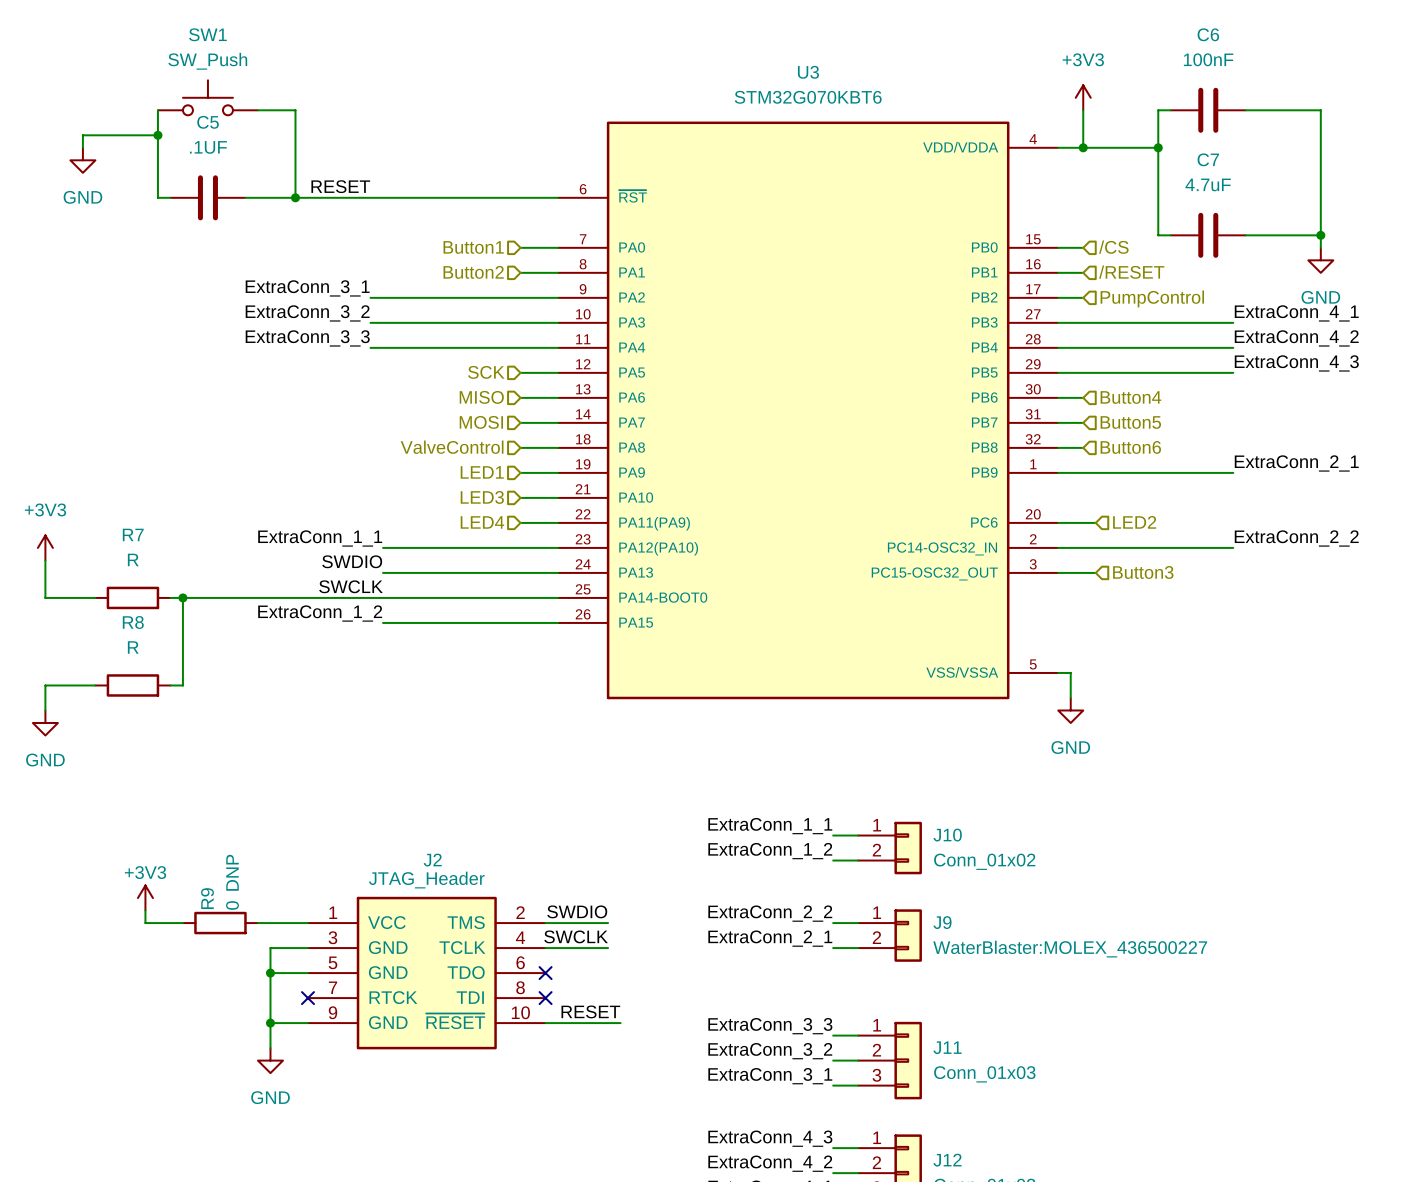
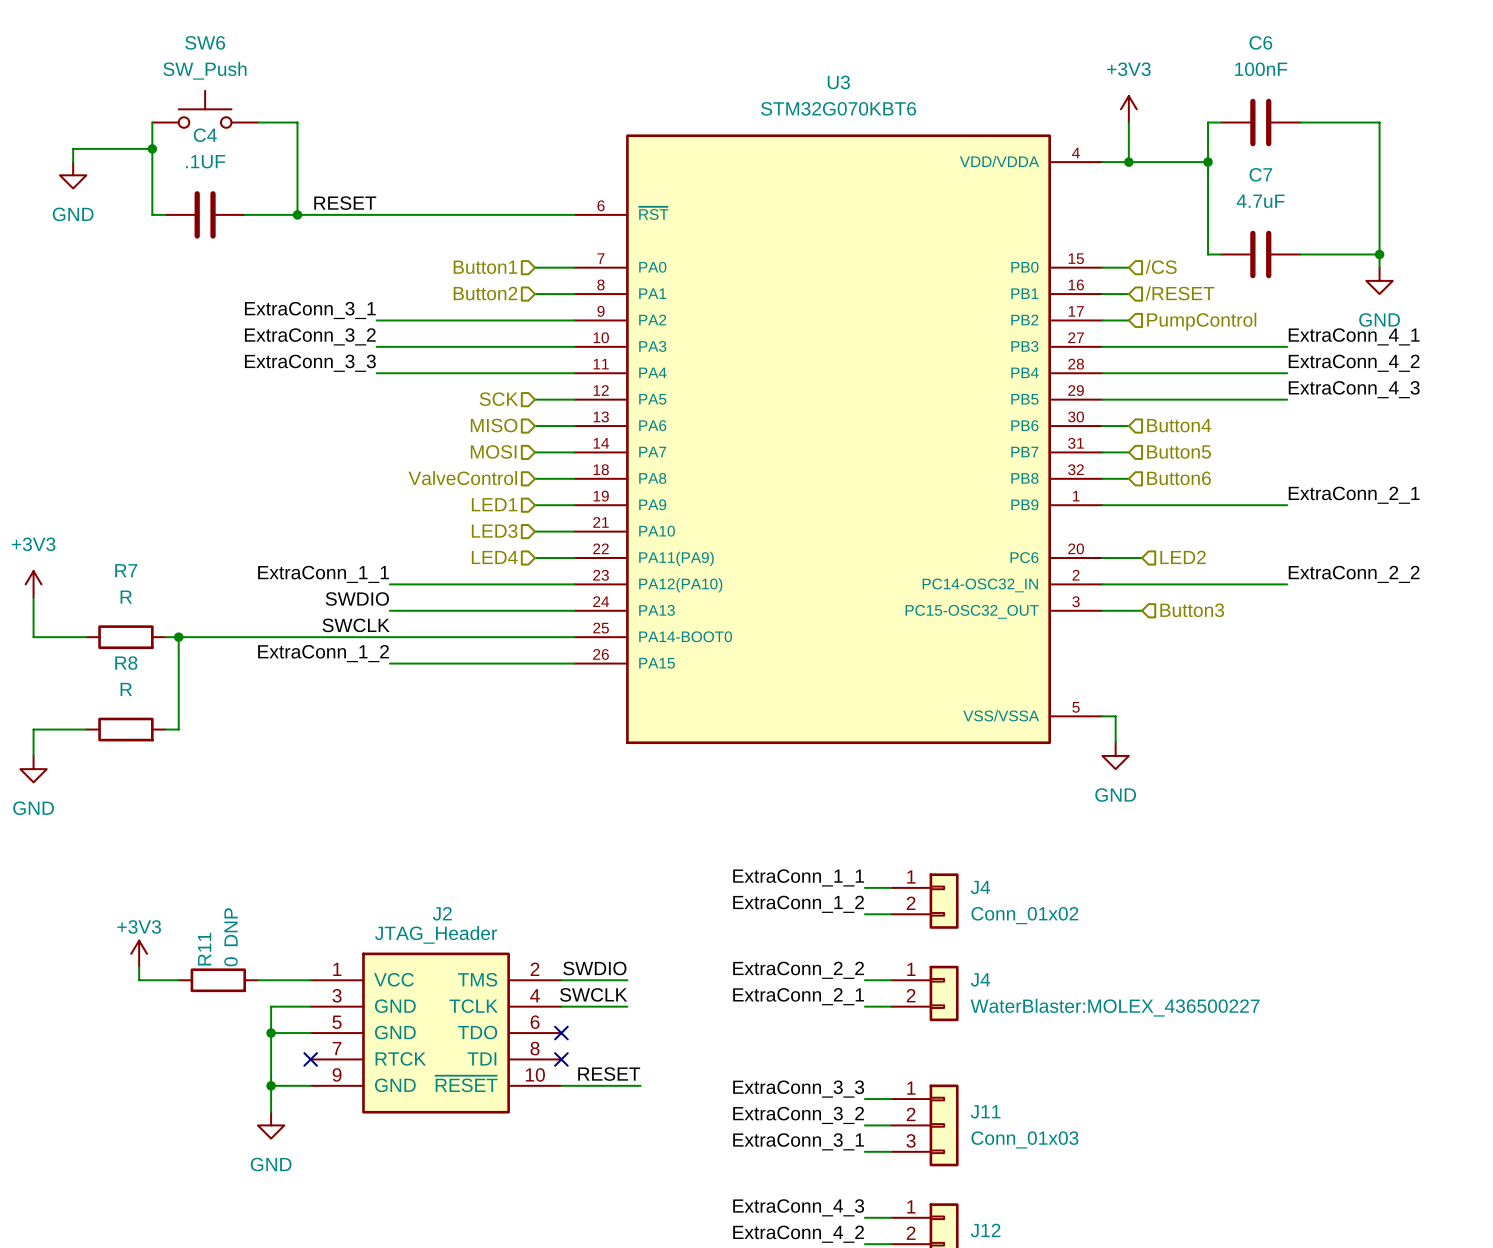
SW1 name: SW1 (207, 34) -> SW6 (205, 42)
C5 name: C5 (208, 122) -> C4 (205, 135)
J10 name: J10 (947, 835) -> J4 (980, 887)
R9 name: R9 (207, 898) -> R11 (204, 949)
J9 name: J9 (942, 922) -> J4 (980, 979)

